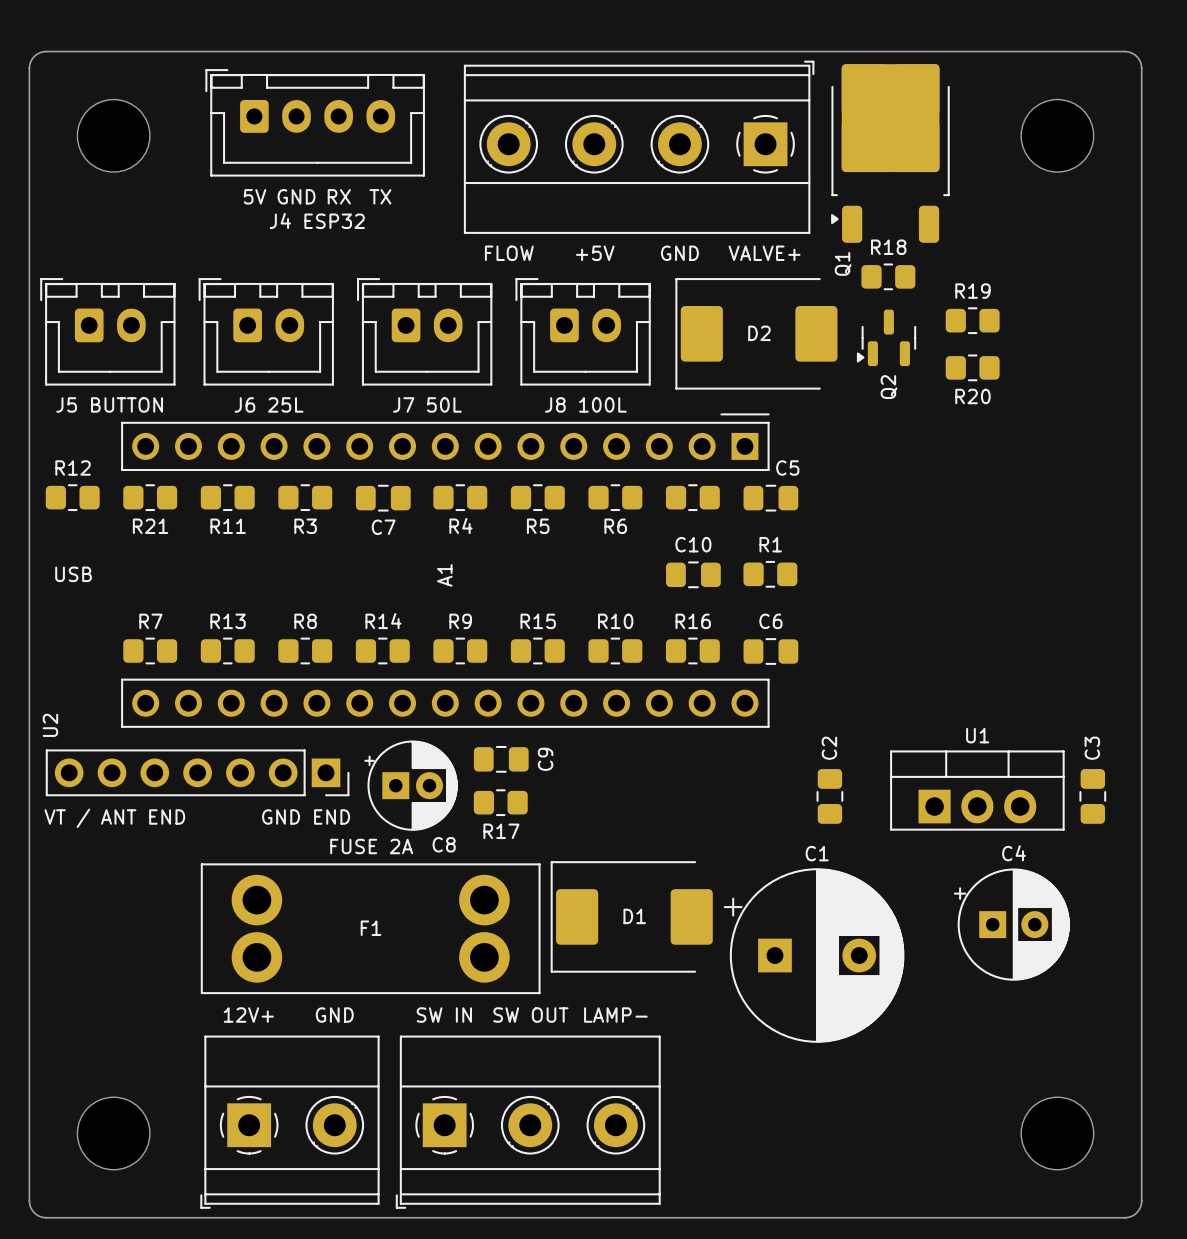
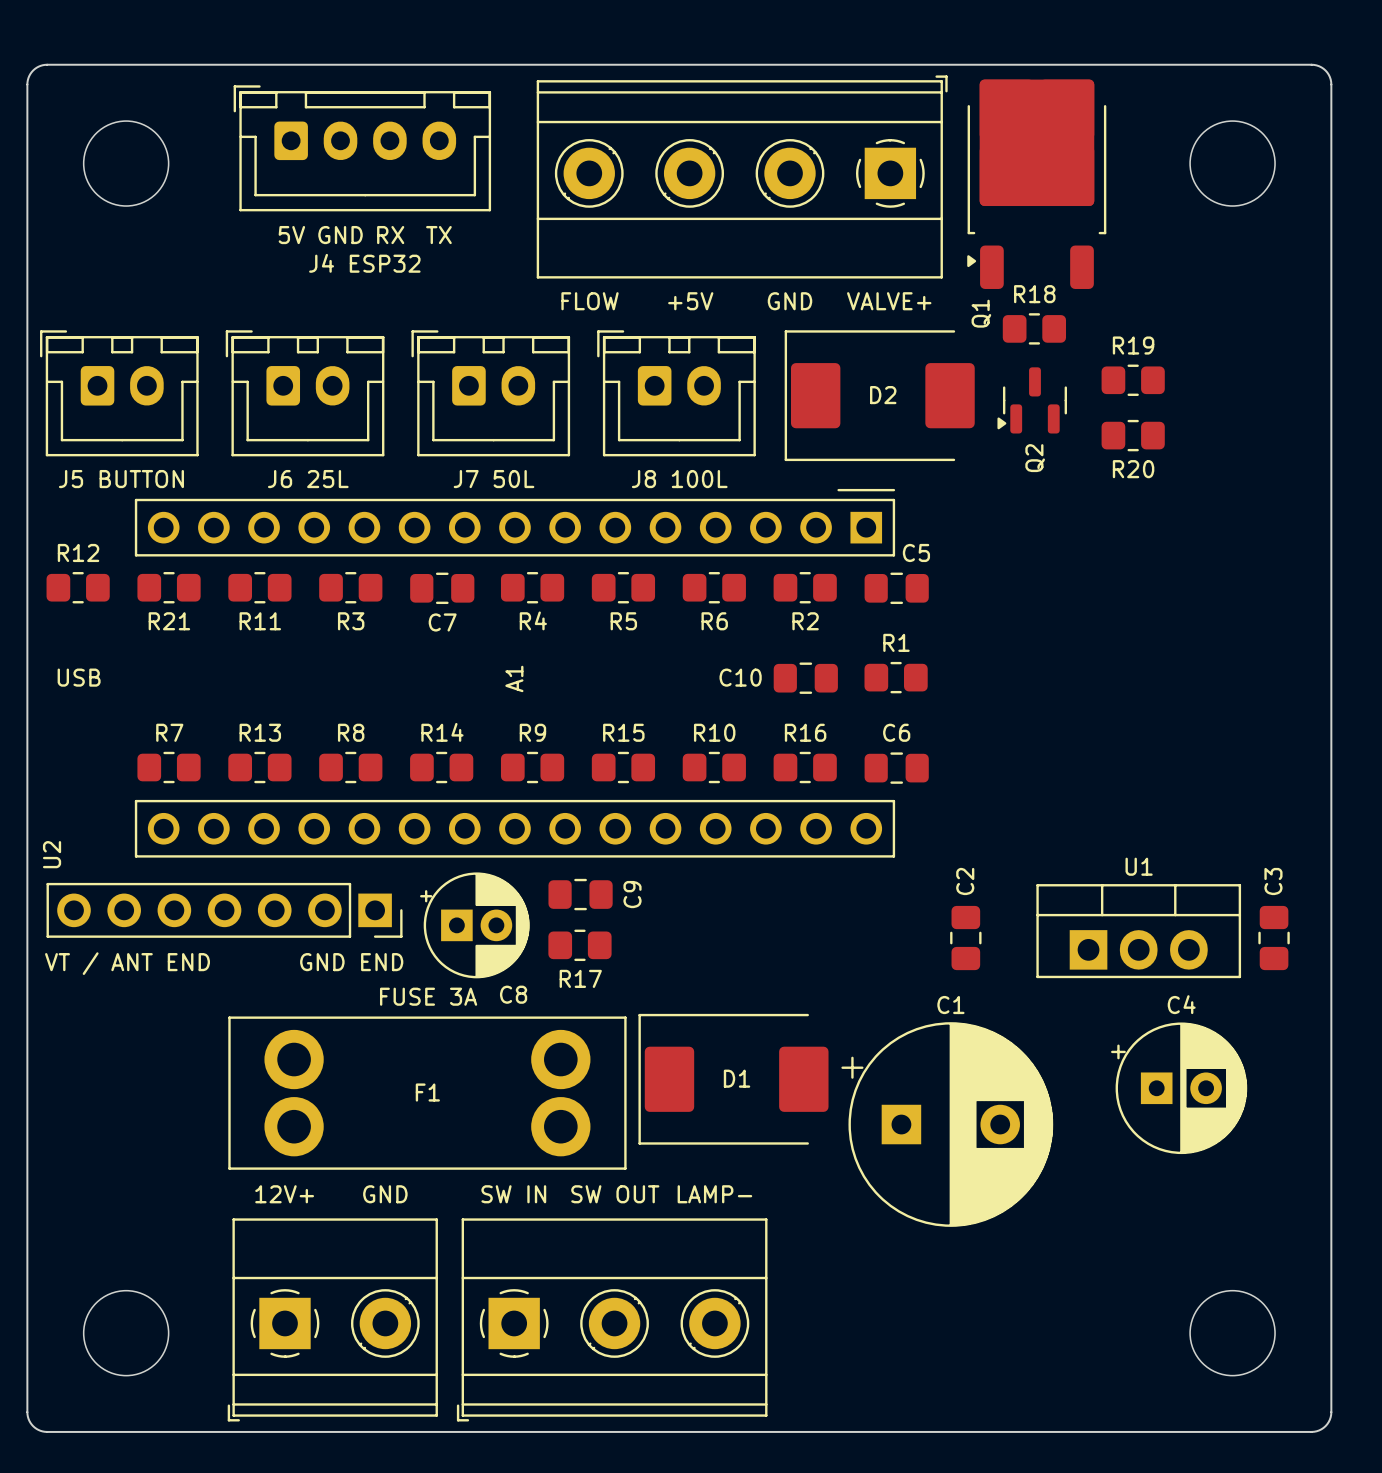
R2 name: none -> R2 (805, 621)
C10 name position: C10 (693, 544) -> C10 (740, 677)
text: FUSE 2A (371, 846) -> FUSE 3A (428, 996)

